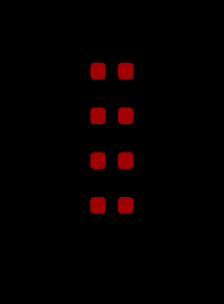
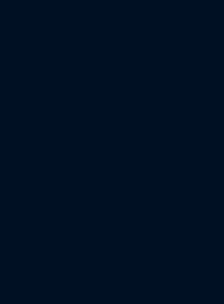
part: (111, 71) -> none
part: (111, 115) -> none
part: (111, 160) -> none
part: (111, 205) -> none

